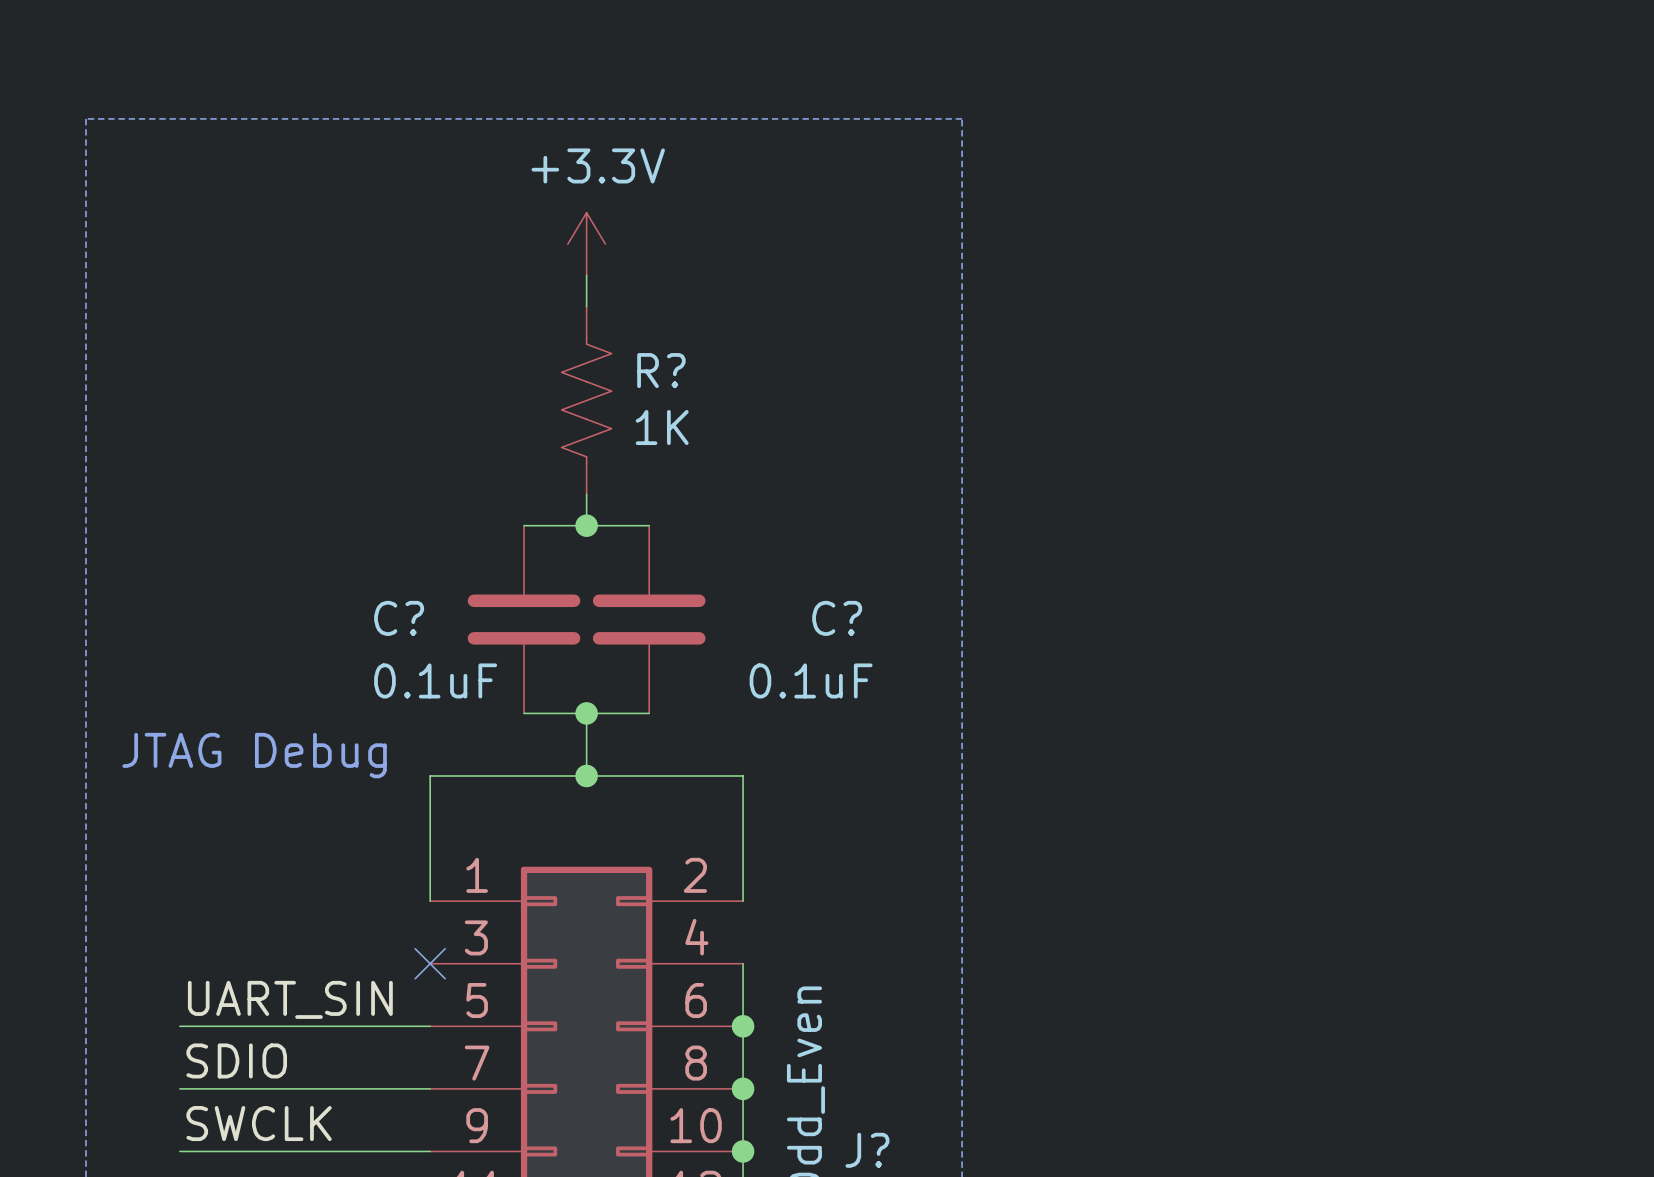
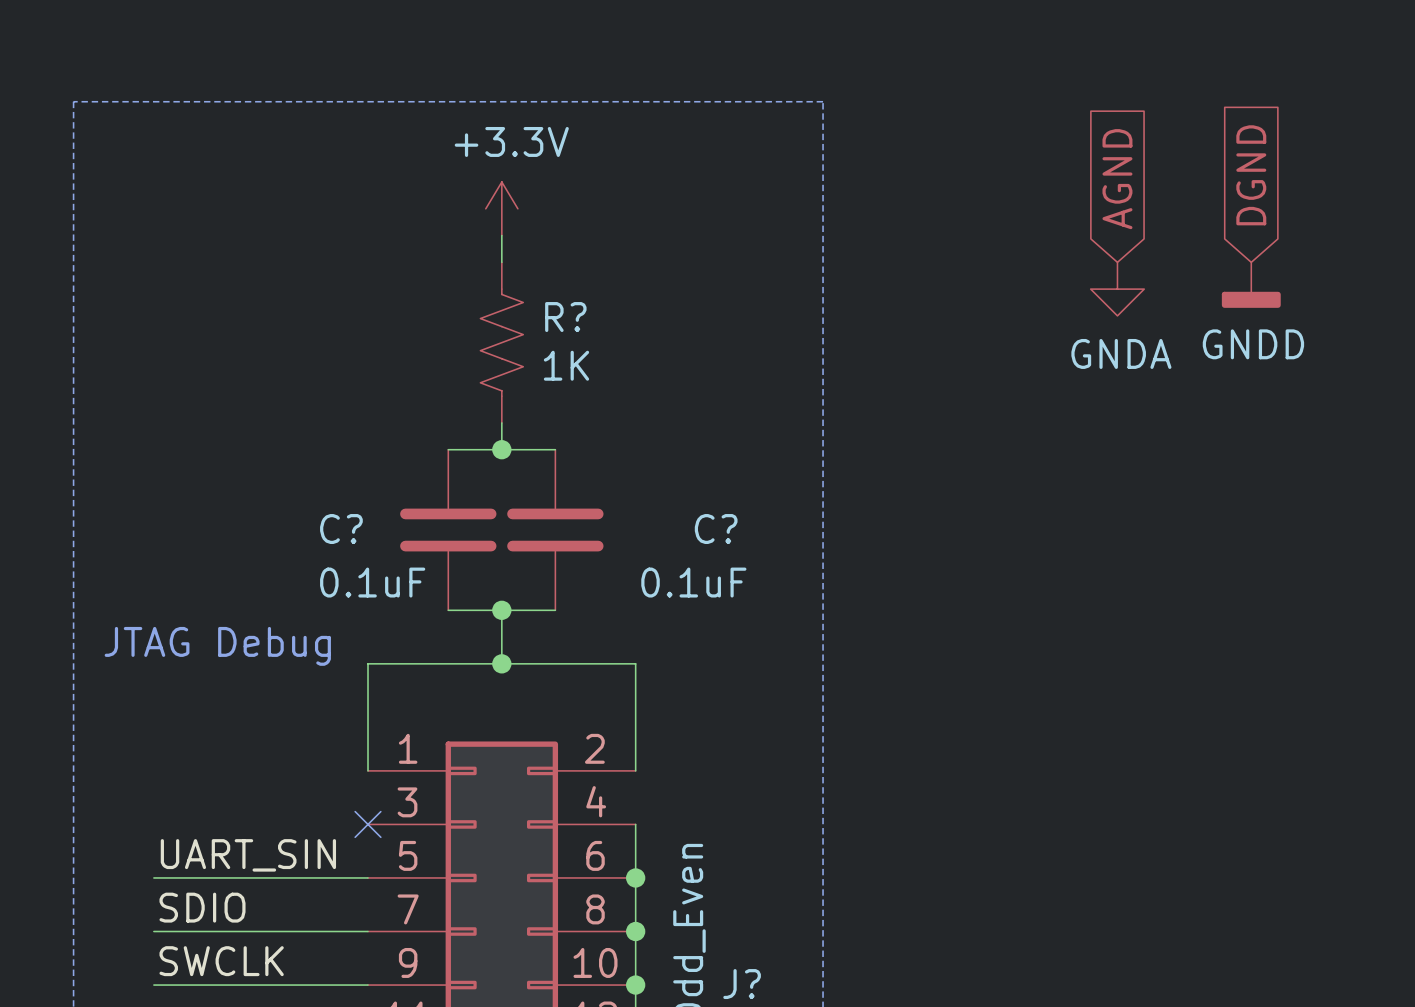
global label: none -> DGND (1251, 175)
global label: none -> AGND (1117, 179)
power symbol: none -> GNDD (1251, 285)
power symbol: none -> GNDA (1117, 289)

